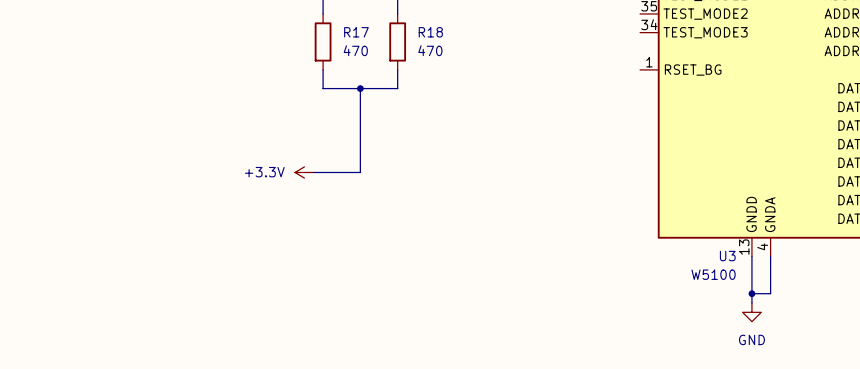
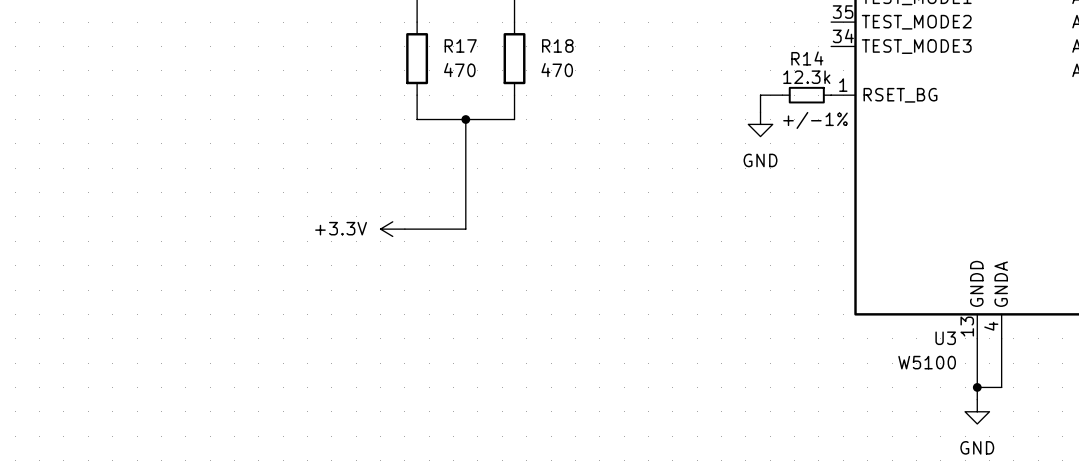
wire: none -> (782, 95) (760, 95) (760, 112)
R14: none -> 12.3k (806, 95)
text: none -> +/-1% (815, 120)
power symbol: none -> GND (760, 124)

